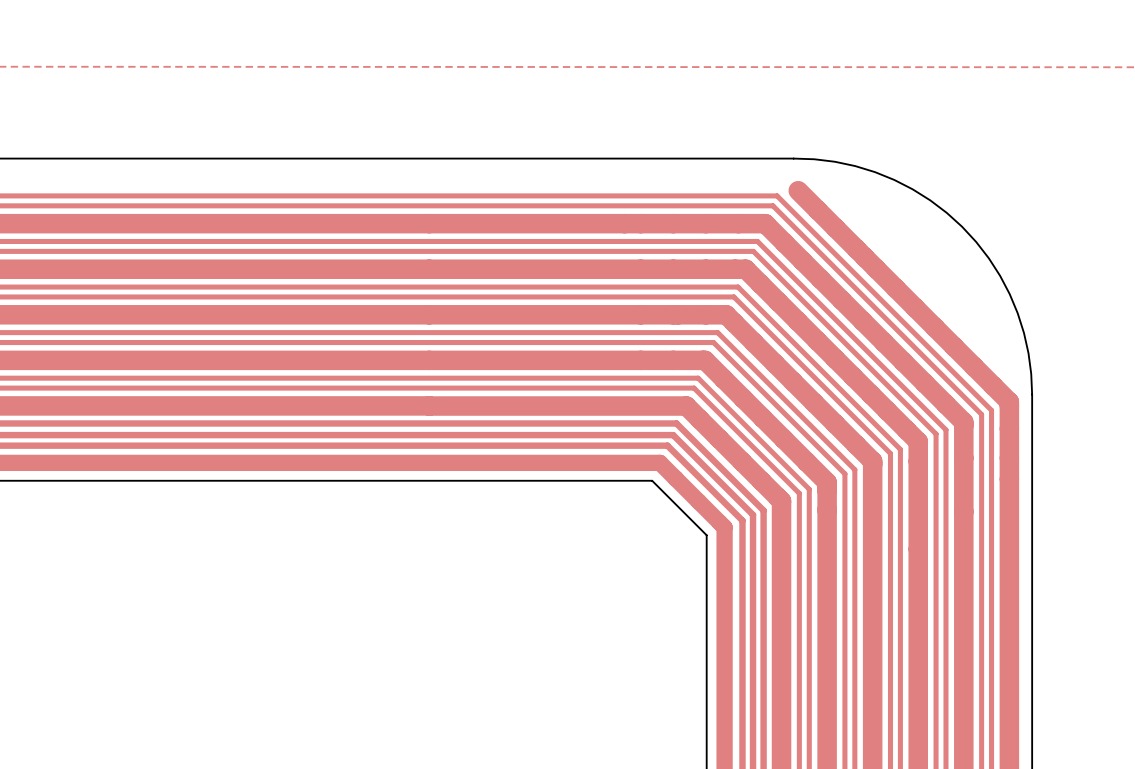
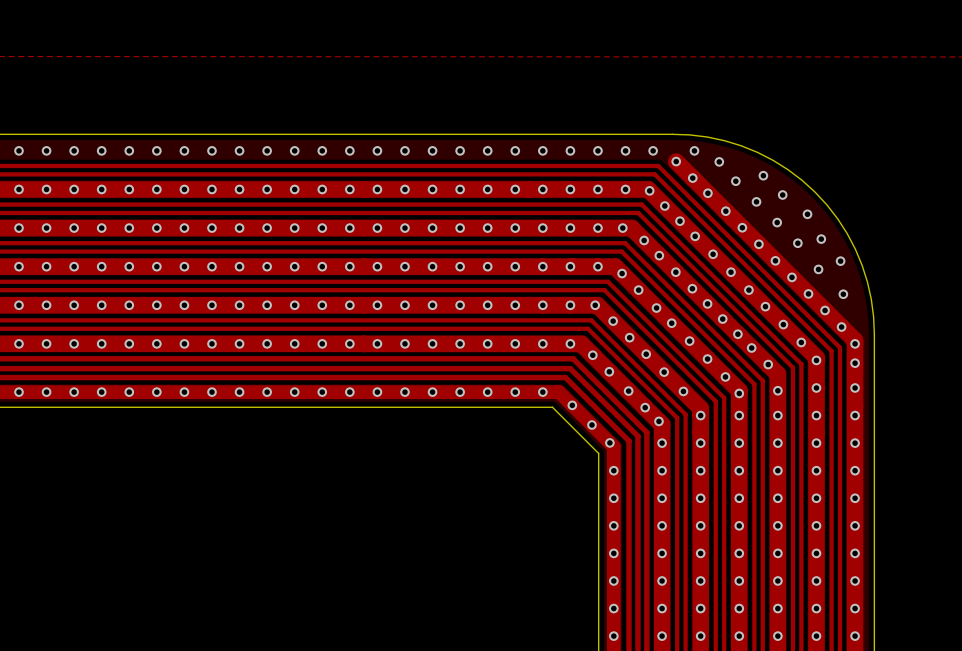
via: none -> (18, 150)
via: none -> (46, 150)
via: none -> (74, 150)
via: none -> (101, 150)
via: none -> (129, 150)
via: none -> (156, 150)
via: none -> (184, 150)
via: none -> (211, 150)
via: none -> (239, 150)
via: none -> (267, 150)
via: none -> (294, 150)
via: none -> (322, 150)
via: none -> (349, 150)
via: none -> (377, 150)
via: none -> (404, 150)
via: none -> (432, 150)
via: none -> (460, 150)
via: none -> (487, 150)
via: none -> (515, 150)
via: none -> (542, 150)
via: none -> (570, 150)
via: none -> (597, 150)
via: none -> (625, 150)
via: none -> (653, 150)
via: none -> (694, 150)
via: none -> (676, 161)
via: none -> (719, 161)
via: none -> (763, 175)
via: none -> (692, 178)
via: none -> (735, 181)
via: none -> (18, 189)
via: none -> (46, 189)
via: none -> (74, 189)
via: none -> (101, 189)
via: none -> (129, 189)
via: none -> (156, 189)
via: none -> (184, 189)
via: none -> (211, 189)
via: none -> (239, 189)
via: none -> (267, 189)
via: none -> (294, 189)
via: none -> (322, 189)
via: none -> (349, 189)
via: none -> (377, 189)
via: none -> (404, 189)
via: none -> (432, 189)
via: none -> (460, 189)
via: none -> (487, 189)
via: none -> (515, 189)
via: none -> (542, 189)
via: none -> (570, 189)
via: none -> (597, 189)
via: none -> (625, 189)
via: none -> (649, 190)
via: none -> (707, 193)
via: none -> (782, 194)
via: none -> (756, 201)
via: none -> (664, 206)
via: none -> (725, 211)
via: none -> (807, 214)
via: none -> (680, 221)
via: none -> (777, 222)
via: none -> (742, 227)
via: none -> (18, 228)
via: none -> (46, 228)
via: none -> (74, 228)
via: none -> (101, 228)
via: none -> (129, 228)
via: none -> (156, 228)
via: none -> (184, 228)
via: none -> (211, 228)
via: none -> (239, 228)
via: none -> (267, 228)
via: none -> (294, 228)
via: none -> (322, 228)
via: none -> (349, 228)
via: none -> (377, 228)
via: none -> (404, 228)
via: none -> (432, 228)
via: none -> (460, 228)
via: none -> (487, 228)
via: none -> (515, 228)
via: none -> (542, 228)
via: none -> (570, 228)
via: none -> (597, 228)
via: none -> (622, 228)
via: none -> (695, 236)
via: none -> (821, 239)
via: none -> (644, 240)
via: none -> (797, 243)
via: none -> (758, 244)
via: none -> (713, 254)
via: none -> (659, 255)
via: none -> (775, 260)
via: none -> (840, 261)
via: none -> (18, 266)
via: none -> (46, 266)
via: none -> (74, 266)
via: none -> (101, 266)
via: none -> (129, 266)
via: none -> (156, 266)
via: none -> (184, 266)
via: none -> (211, 266)
via: none -> (239, 266)
via: none -> (267, 266)
via: none -> (294, 266)
via: none -> (322, 266)
via: none -> (349, 266)
via: none -> (377, 266)
via: none -> (404, 266)
via: none -> (432, 266)
via: none -> (460, 266)
via: none -> (487, 266)
via: none -> (515, 266)
via: none -> (542, 266)
via: none -> (570, 266)
via: none -> (597, 266)
via: none -> (818, 269)
via: none -> (675, 272)
via: none -> (731, 272)
via: none -> (622, 273)
via: none -> (791, 277)
via: none -> (692, 288)
via: none -> (638, 290)
via: none -> (748, 290)
via: none -> (808, 293)
via: none -> (843, 294)
via: none -> (707, 303)
via: none -> (18, 305)
via: none -> (46, 305)
via: none -> (74, 305)
via: none -> (101, 305)
via: none -> (129, 305)
via: none -> (156, 305)
via: none -> (184, 305)
via: none -> (211, 305)
via: none -> (239, 305)
via: none -> (267, 305)
via: none -> (294, 305)
via: none -> (322, 305)
via: none -> (349, 305)
via: none -> (377, 305)
via: none -> (404, 305)
via: none -> (432, 305)
via: none -> (460, 305)
via: none -> (487, 305)
via: none -> (515, 305)
via: none -> (542, 305)
via: none -> (570, 305)
via: none -> (595, 305)
via: none -> (765, 306)
via: none -> (656, 308)
via: none -> (825, 310)
via: none -> (722, 319)
via: none -> (613, 321)
via: none -> (671, 323)
via: none -> (783, 324)
via: none -> (841, 327)
via: none -> (737, 334)
via: none -> (629, 337)
via: none -> (689, 341)
via: none -> (801, 342)
via: none -> (18, 343)
via: none -> (46, 343)
via: none -> (74, 343)
via: none -> (101, 343)
via: none -> (129, 343)
via: none -> (156, 343)
via: none -> (184, 343)
via: none -> (211, 343)
via: none -> (239, 343)
via: none -> (267, 343)
via: none -> (294, 343)
via: none -> (322, 343)
via: none -> (349, 343)
via: none -> (377, 343)
via: none -> (404, 343)
via: none -> (432, 343)
via: none -> (460, 343)
via: none -> (487, 343)
via: none -> (515, 343)
via: none -> (542, 343)
via: none -> (570, 343)
via: none -> (855, 343)
via: none -> (751, 348)
via: none -> (646, 354)
via: none -> (592, 355)
via: none -> (707, 359)
via: none -> (816, 360)
via: none -> (855, 363)
via: none -> (768, 364)
via: none -> (609, 371)
via: none -> (664, 372)
via: none -> (725, 376)
via: none -> (816, 387)
via: none -> (855, 387)
via: none -> (628, 391)
via: none -> (777, 390)
via: none -> (18, 392)
via: none -> (46, 392)
via: none -> (74, 392)
via: none -> (101, 392)
via: none -> (129, 392)
via: none -> (156, 392)
via: none -> (184, 392)
via: none -> (211, 392)
via: none -> (239, 392)
via: none -> (267, 392)
via: none -> (294, 392)
via: none -> (322, 392)
via: none -> (349, 392)
via: none -> (377, 392)
via: none -> (404, 392)
via: none -> (432, 392)
via: none -> (460, 392)
via: none -> (487, 392)
via: none -> (515, 392)
via: none -> (542, 392)
via: none -> (683, 391)
via: none -> (739, 393)
via: none -> (572, 405)
via: none -> (645, 407)
via: none -> (700, 415)
via: none -> (739, 415)
via: none -> (777, 415)
via: none -> (816, 415)
via: none -> (855, 415)
via: none -> (658, 421)
via: none -> (591, 425)
via: none -> (609, 442)
via: none -> (662, 443)
via: none -> (700, 443)
via: none -> (739, 443)
via: none -> (777, 443)
via: none -> (816, 443)
via: none -> (855, 443)
via: none -> (613, 470)
via: none -> (662, 470)
via: none -> (700, 470)
via: none -> (739, 470)
via: none -> (777, 470)
via: none -> (816, 470)
via: none -> (855, 470)
via: none -> (613, 498)
via: none -> (662, 498)
via: none -> (700, 498)
via: none -> (739, 498)
via: none -> (777, 498)
via: none -> (816, 498)
via: none -> (855, 498)
via: none -> (613, 525)
via: none -> (662, 525)
via: none -> (700, 525)
via: none -> (739, 525)
via: none -> (777, 525)
via: none -> (816, 525)
via: none -> (855, 525)
via: none -> (613, 553)
via: none -> (662, 553)
via: none -> (700, 553)
via: none -> (739, 553)
via: none -> (777, 553)
via: none -> (816, 553)
via: none -> (855, 553)
via: none -> (613, 580)
via: none -> (662, 580)
via: none -> (700, 580)
via: none -> (739, 580)
via: none -> (777, 580)
via: none -> (816, 580)
via: none -> (855, 580)
via: none -> (613, 608)
via: none -> (662, 608)
via: none -> (700, 608)
via: none -> (739, 608)
via: none -> (777, 608)
via: none -> (816, 608)
via: none -> (855, 608)
via: none -> (613, 636)
via: none -> (662, 636)
via: none -> (700, 636)
via: none -> (739, 636)
via: none -> (777, 636)
via: none -> (816, 636)
via: none -> (855, 636)

